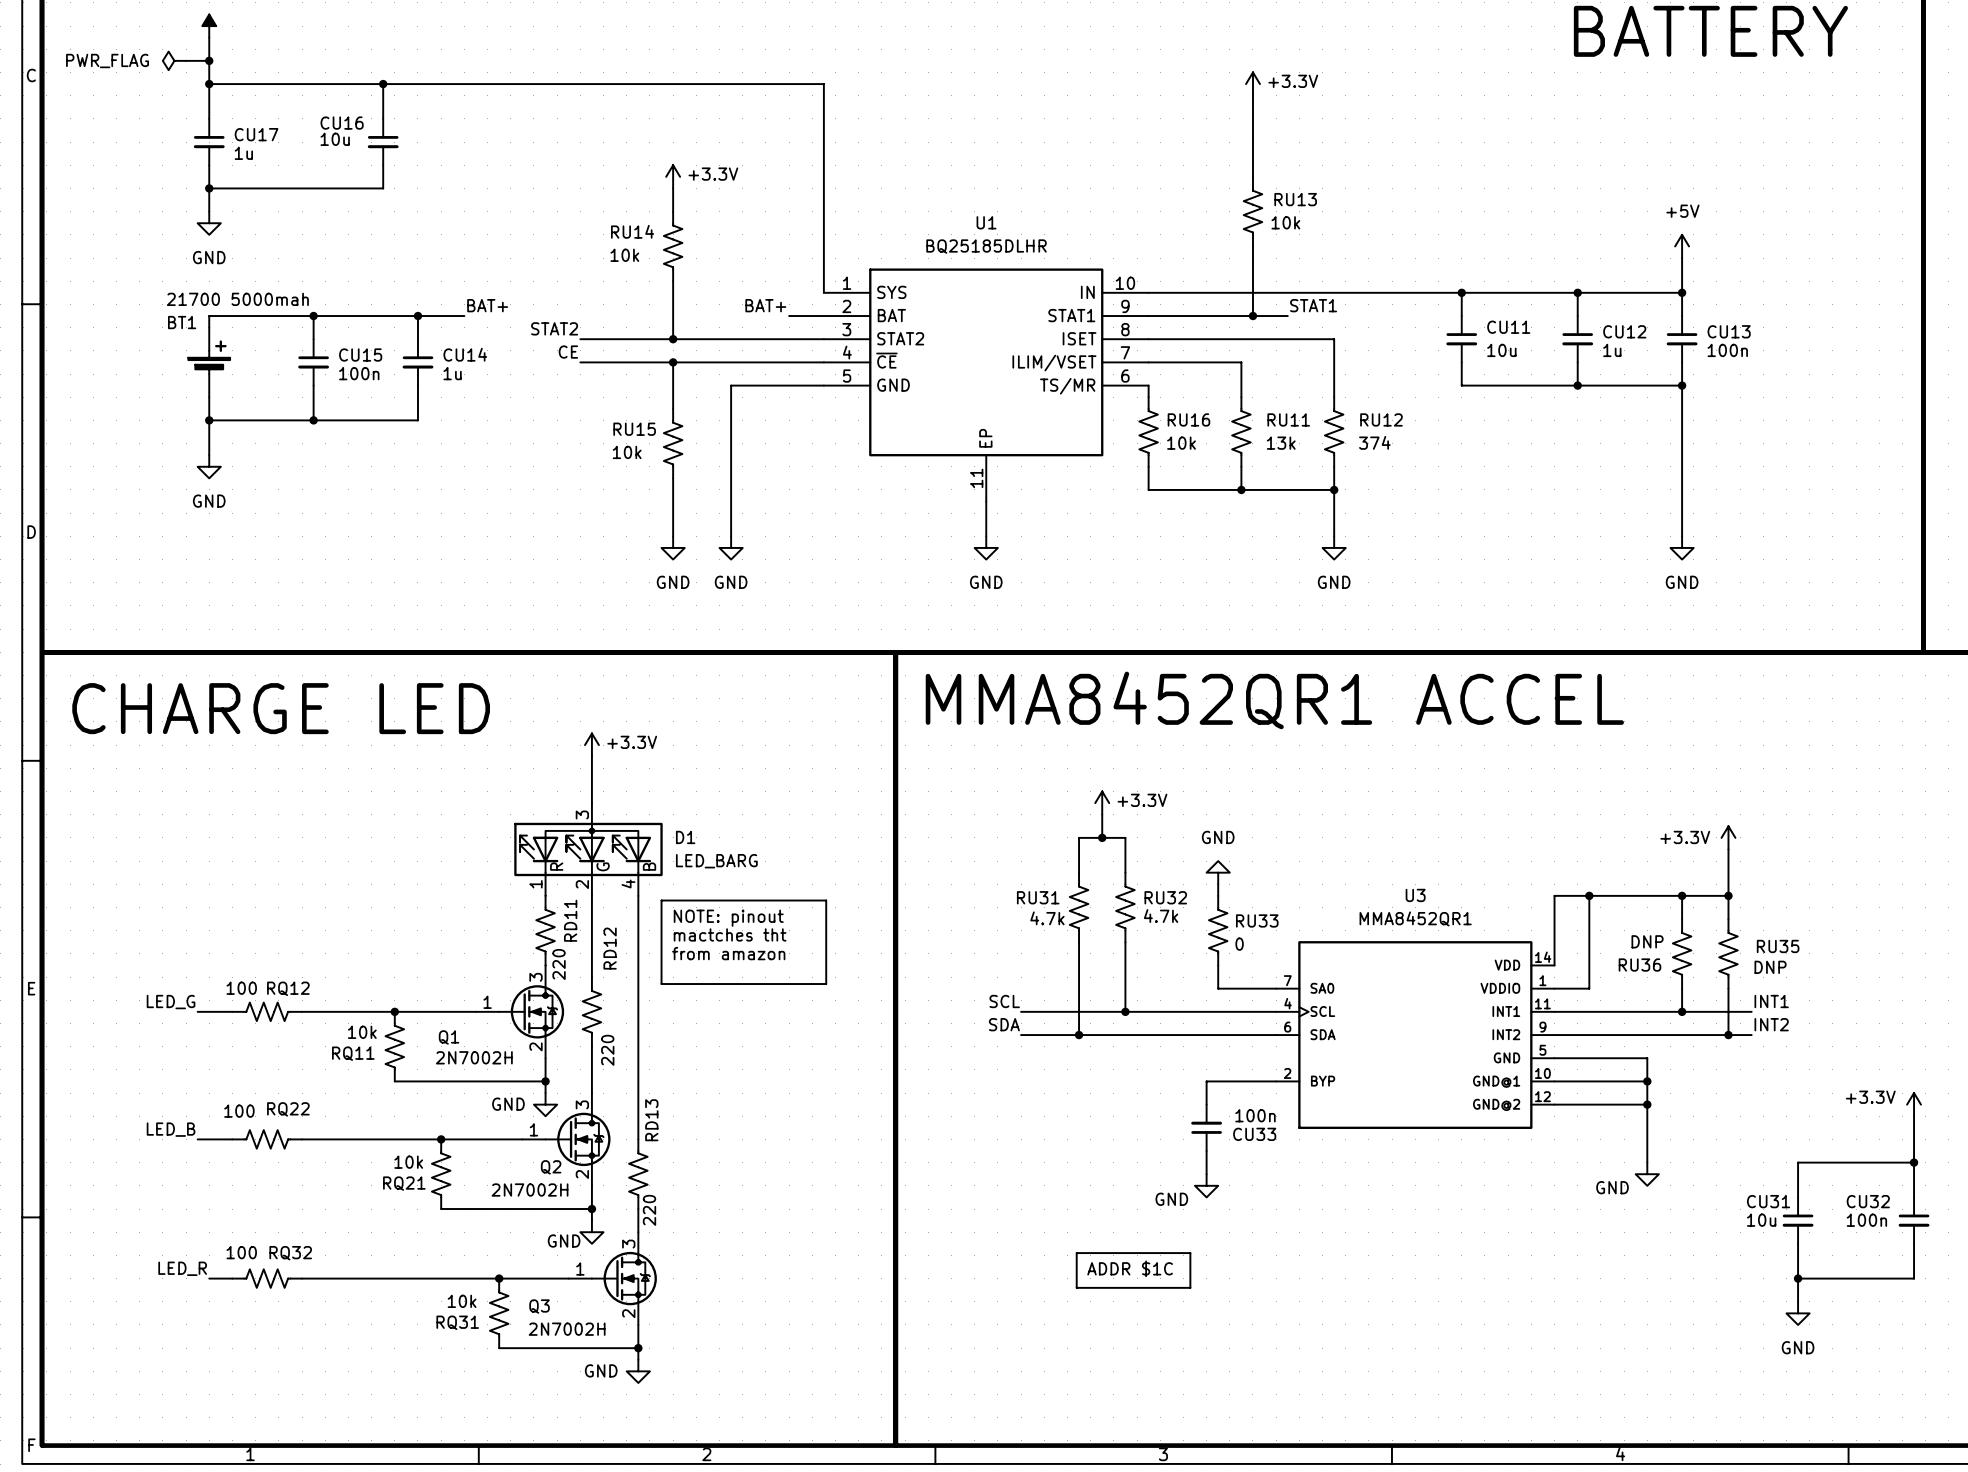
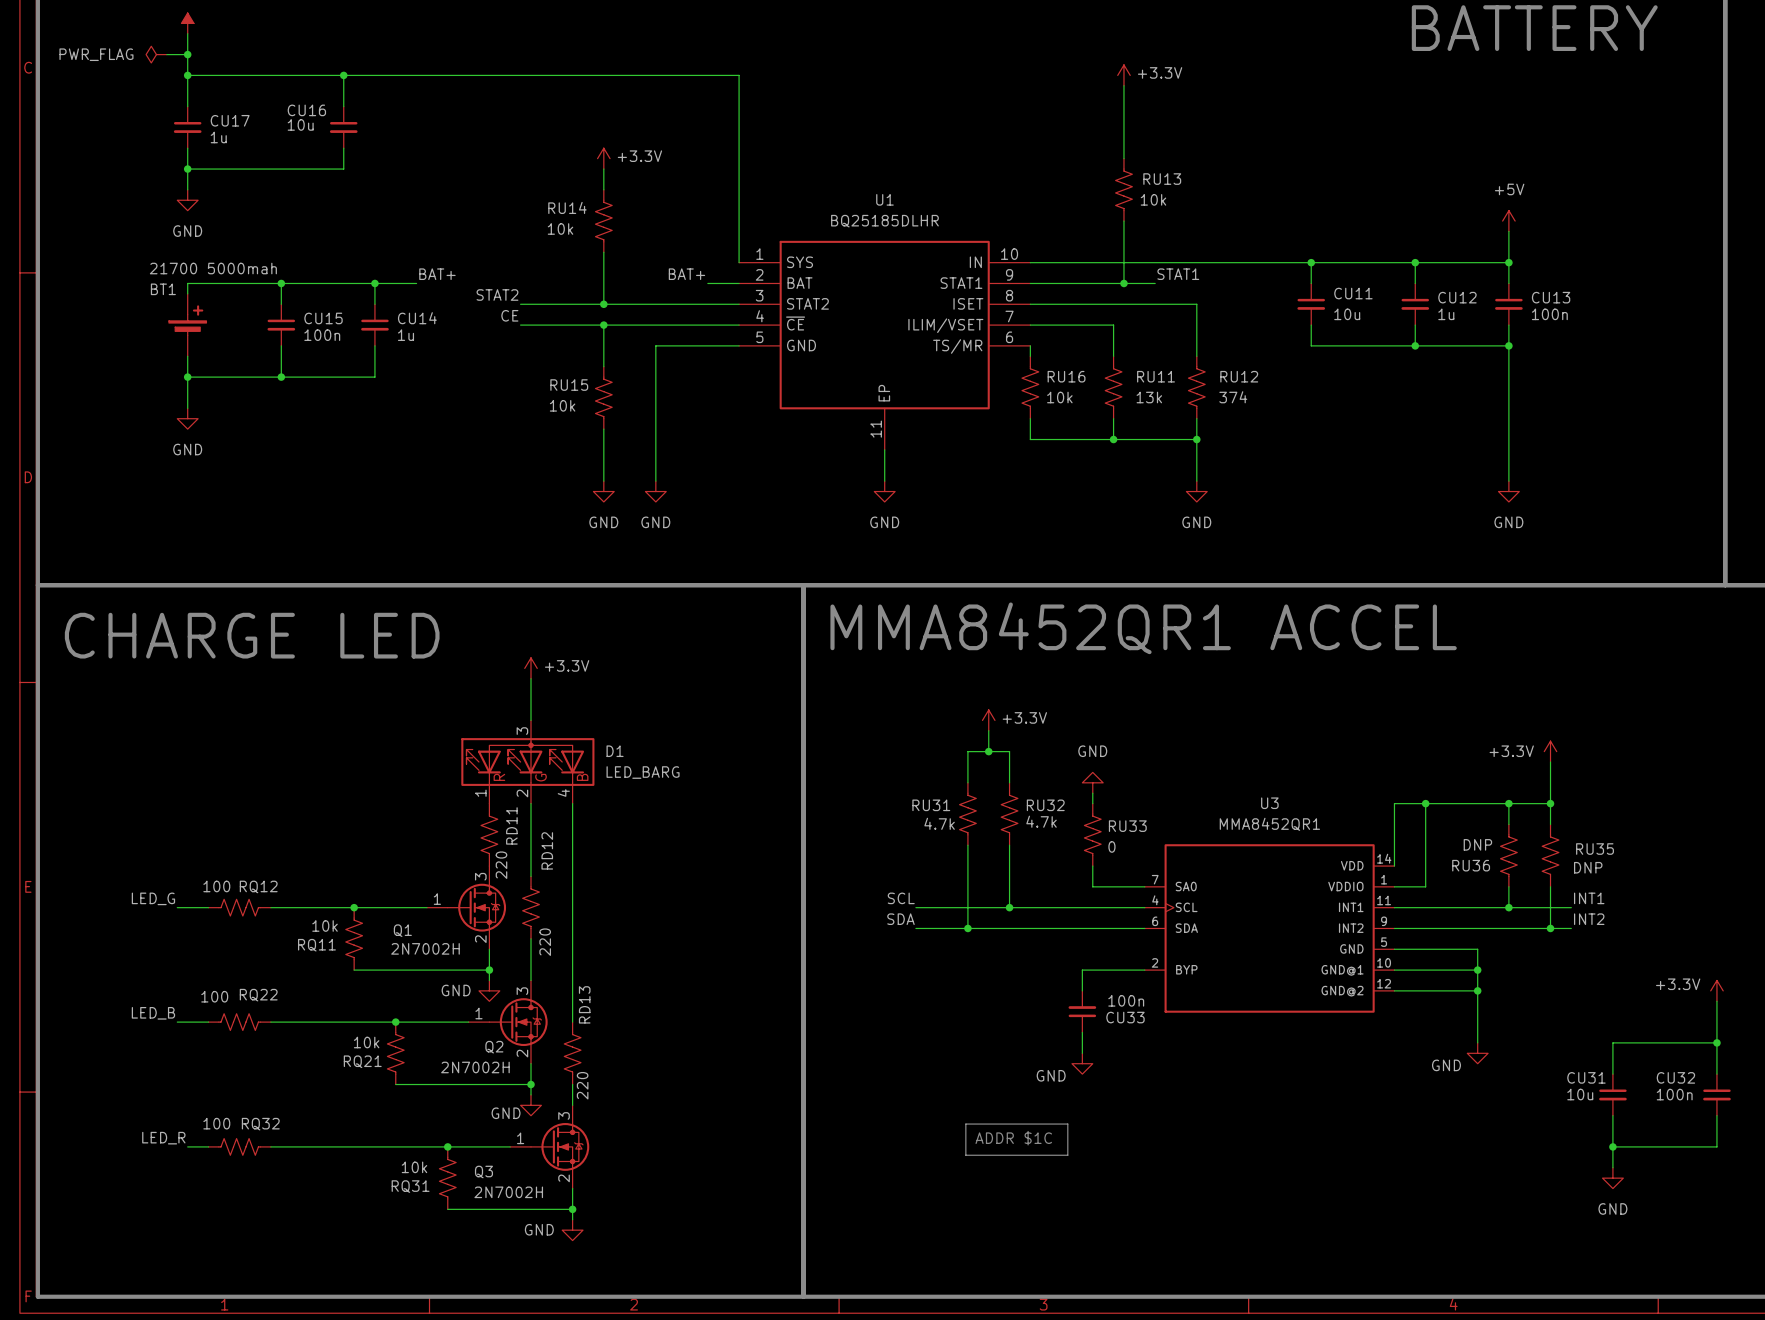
line: (661, 900) (826, 900) (826, 984) (661, 984) (661, 900) -> none
text: NOTE: pinout (728, 918) -> none
text: mactches tht (730, 934) -> none
text: from amazon (728, 953) -> none

